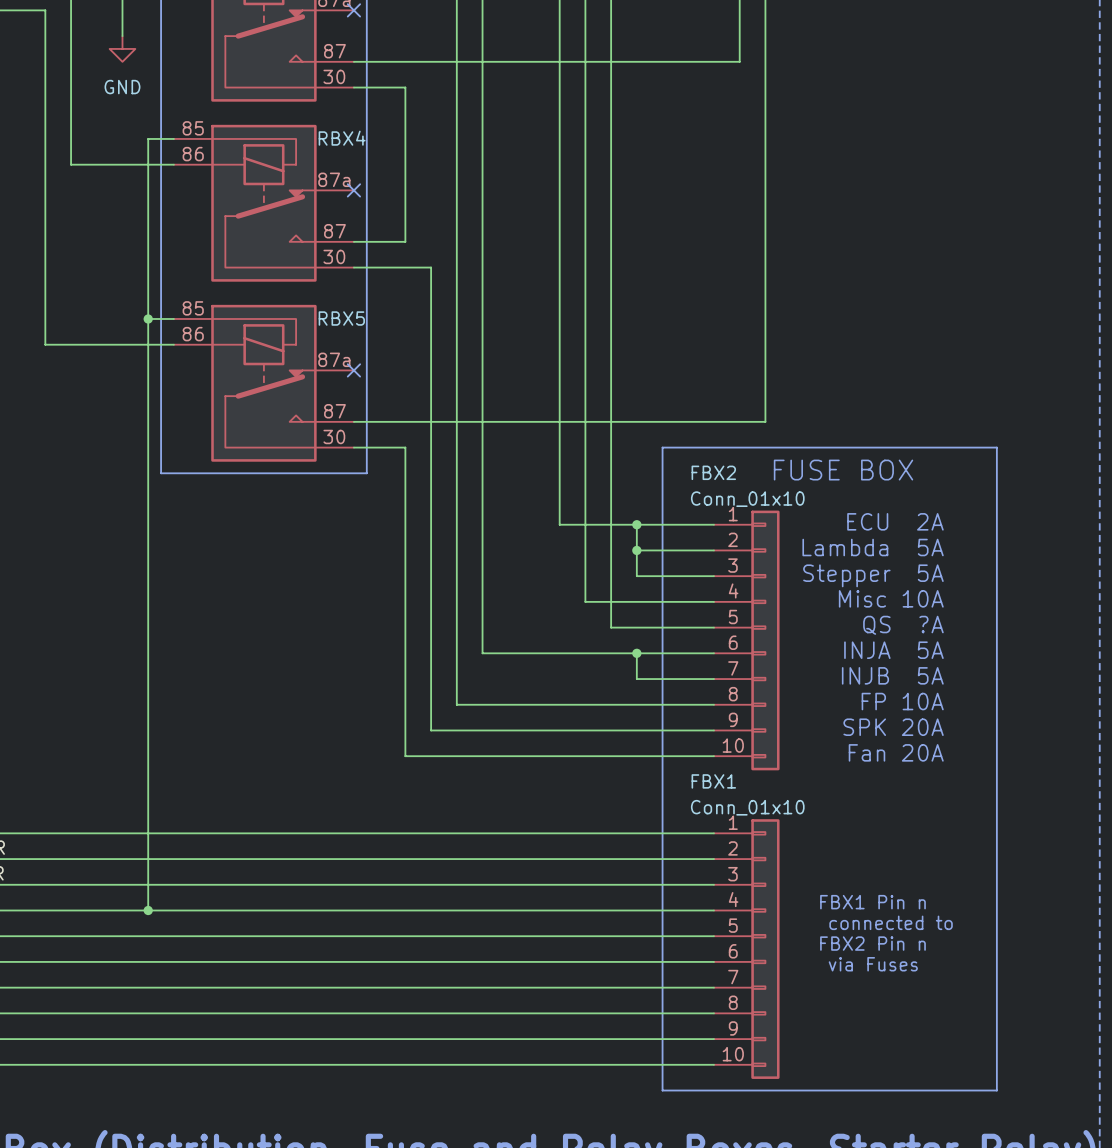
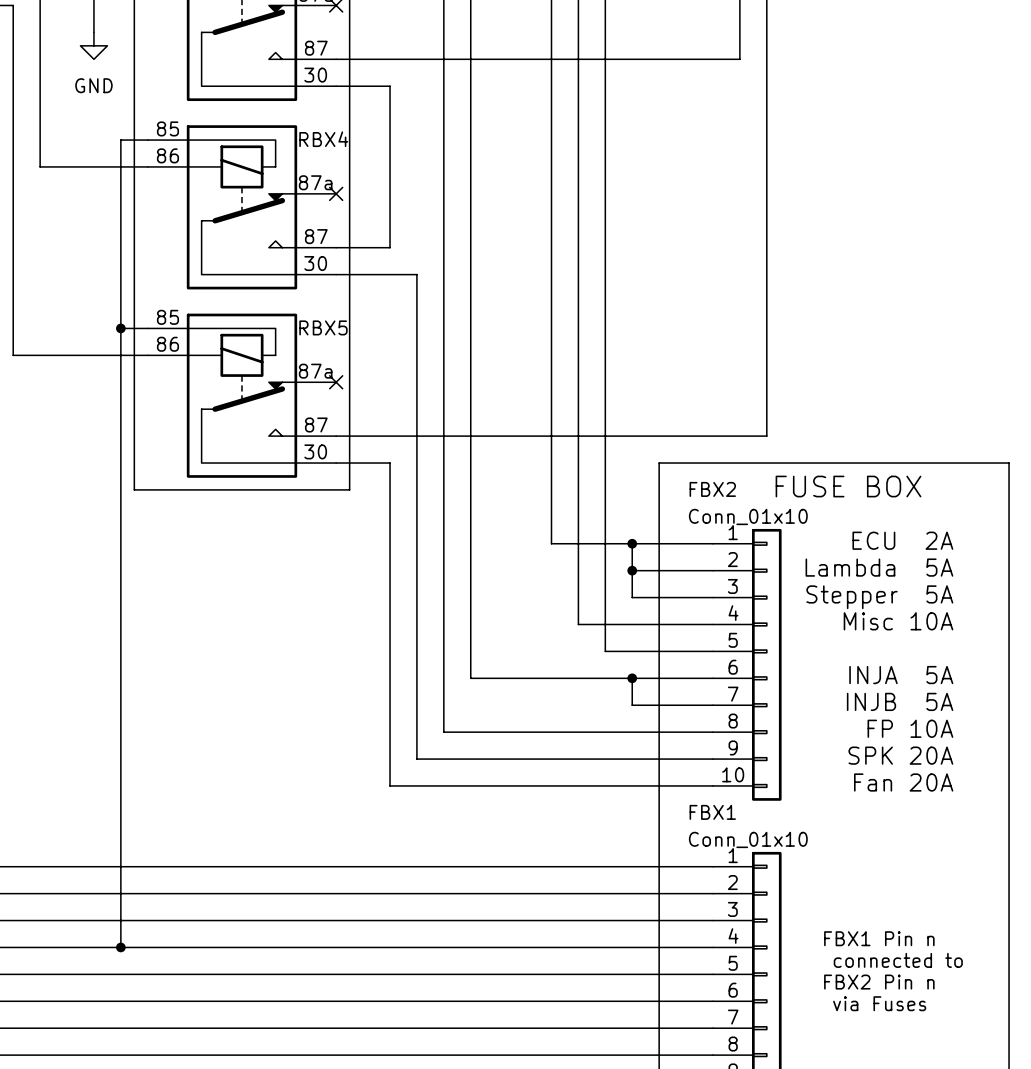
text: QS ?A (903, 625) -> none

